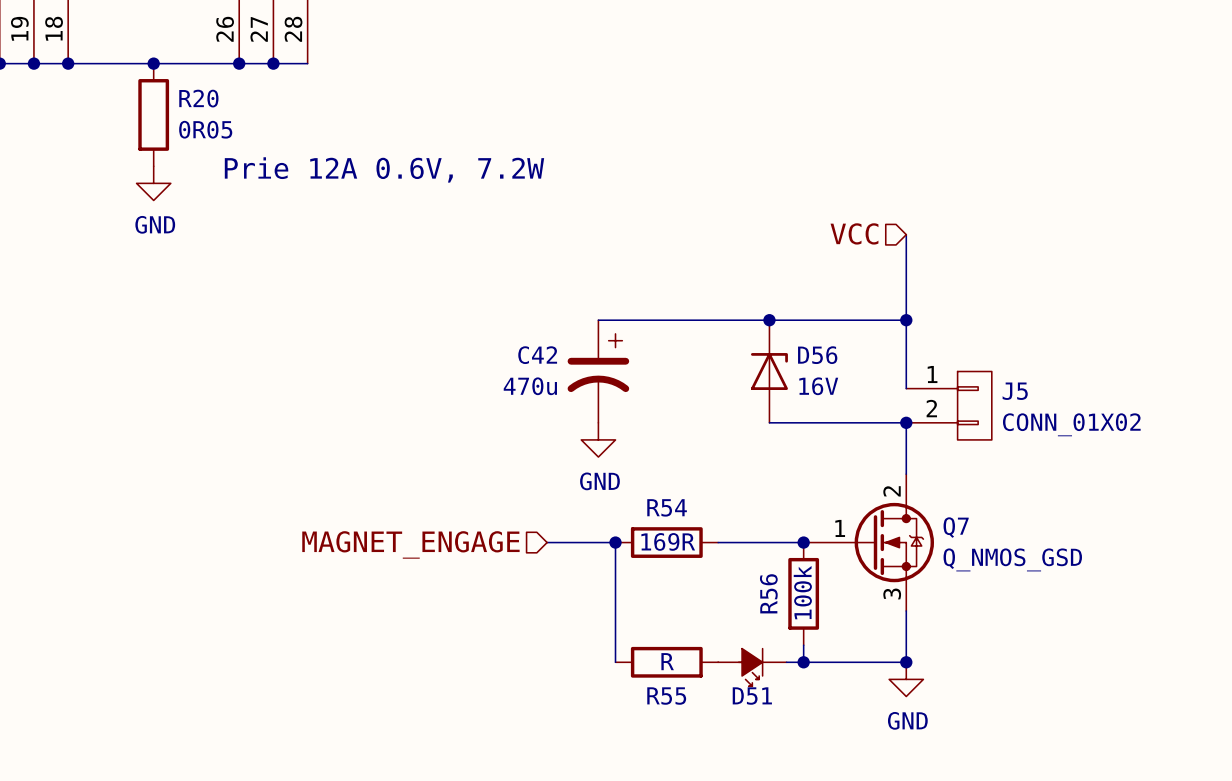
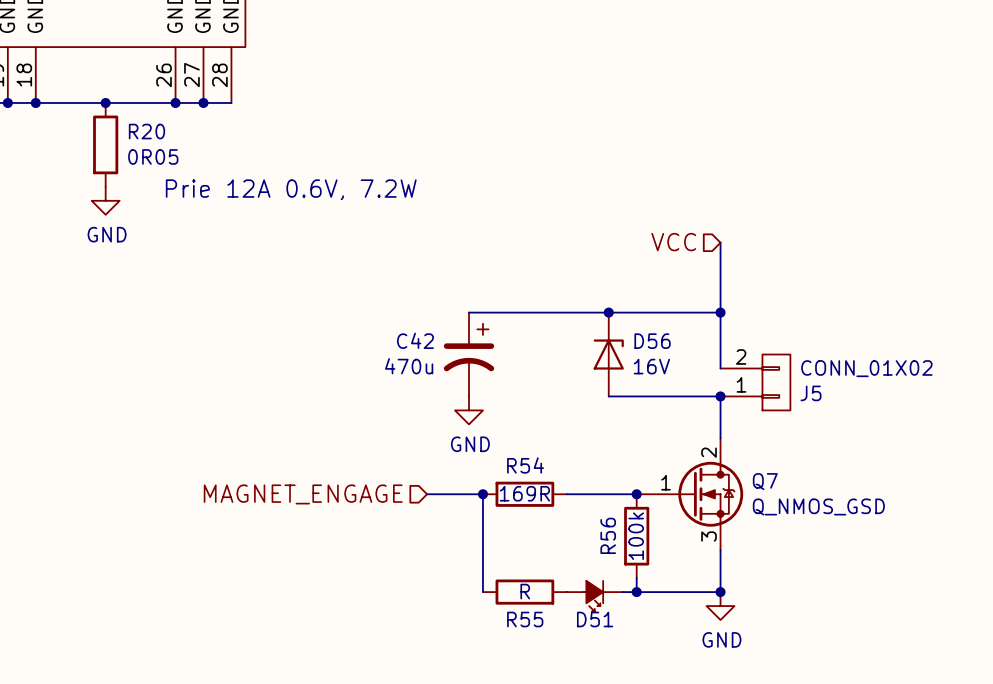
J5 flip: as is (974, 405) -> up-down (776, 382)

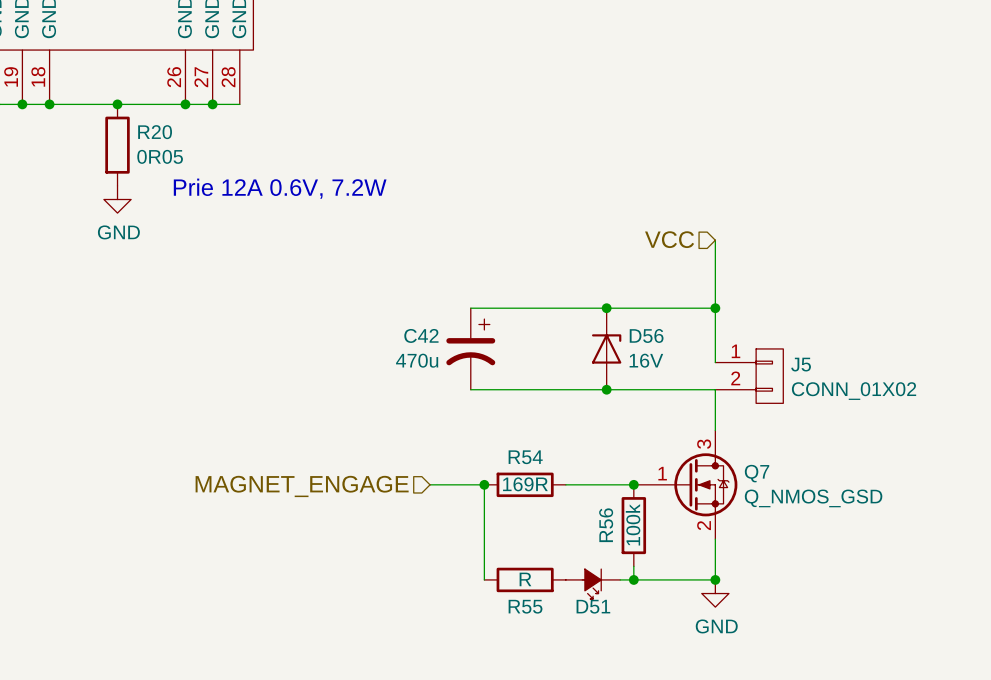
J5 flip: as is (776, 382) -> up-down (769, 376)
wire: none -> (470, 389) (606, 389)
junction: none -> (606, 389)
junction: (720, 396) -> none
power symbol: GND (469, 410) -> none
Q7 pin number: 2 (709, 452) -> 3 (704, 444)
Q7 pin number: 3 (709, 536) -> 2 (704, 525)

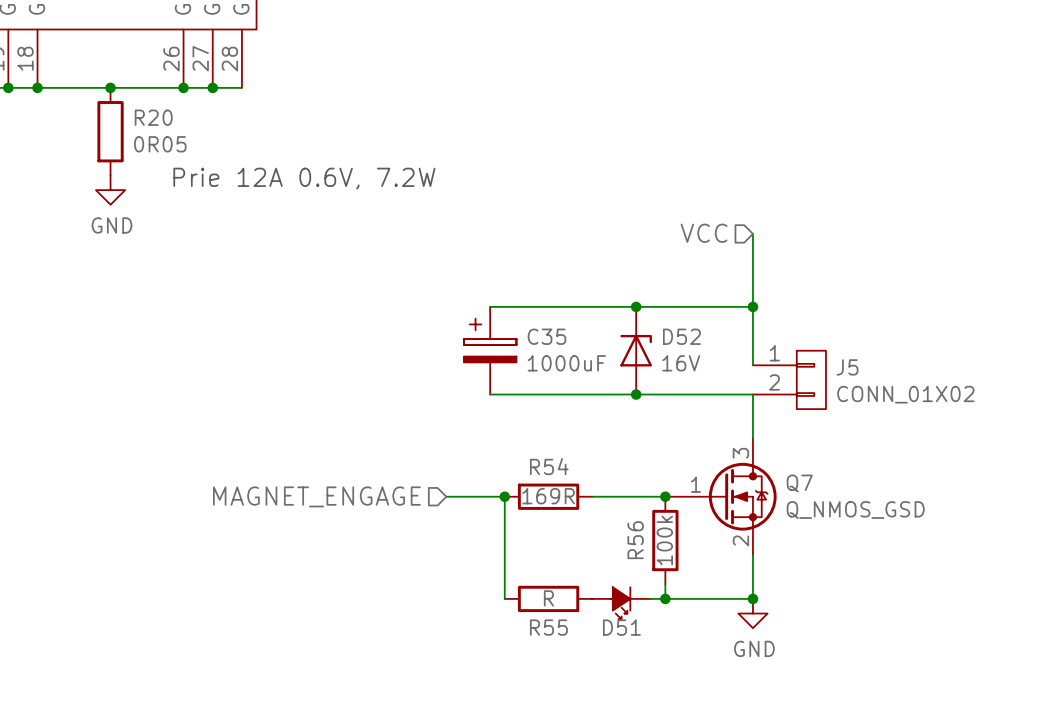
D56 name: D56 (646, 335) -> D52 (681, 336)
C42: 470u (470, 348) -> none
C35: none -> 1000uF (490, 350)

